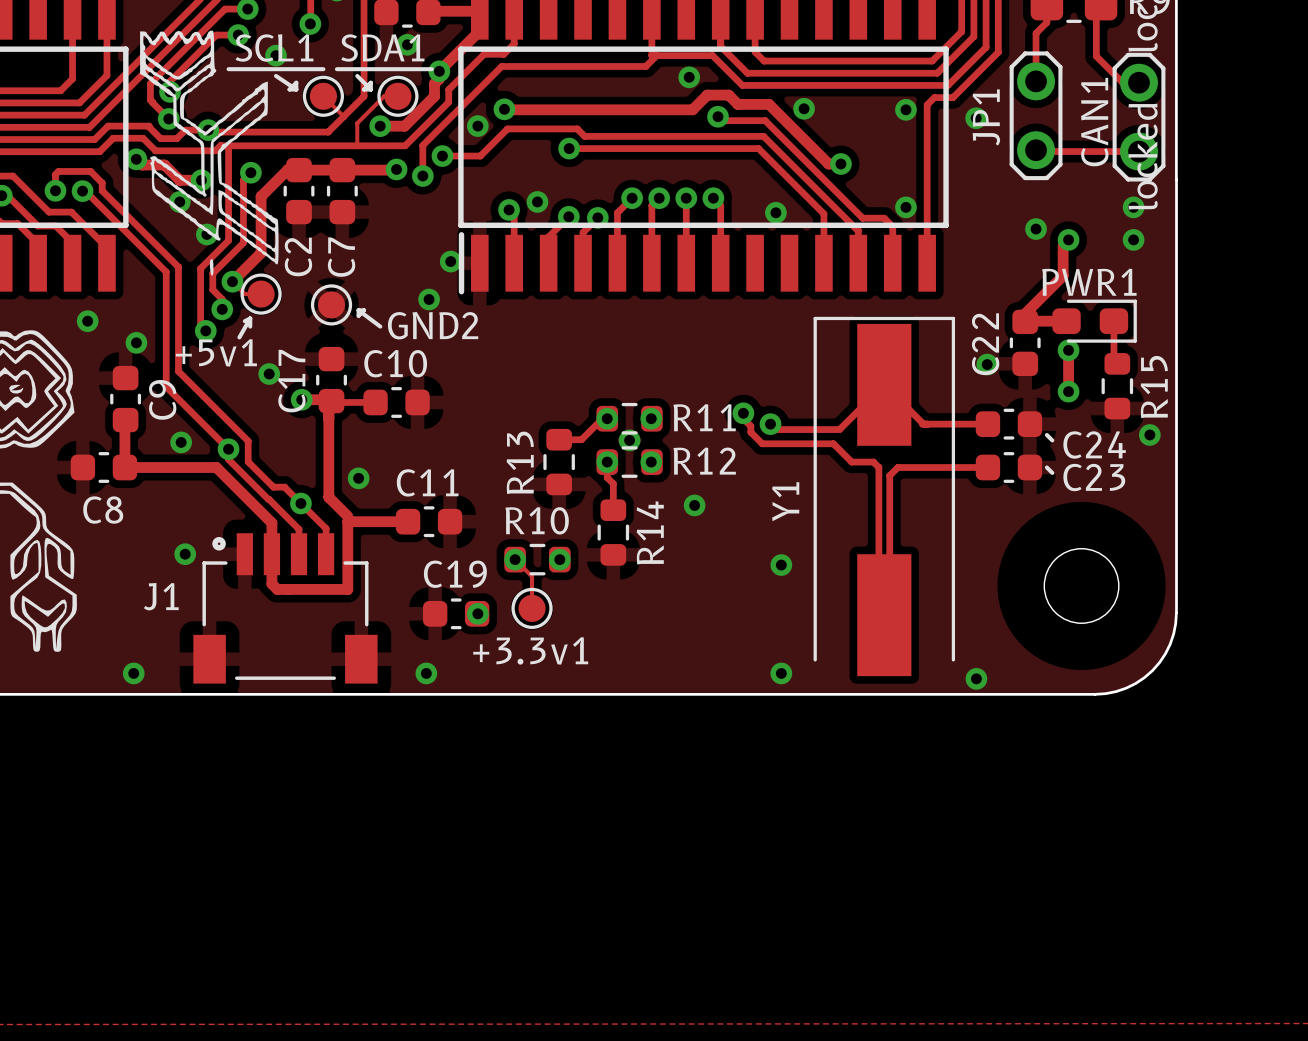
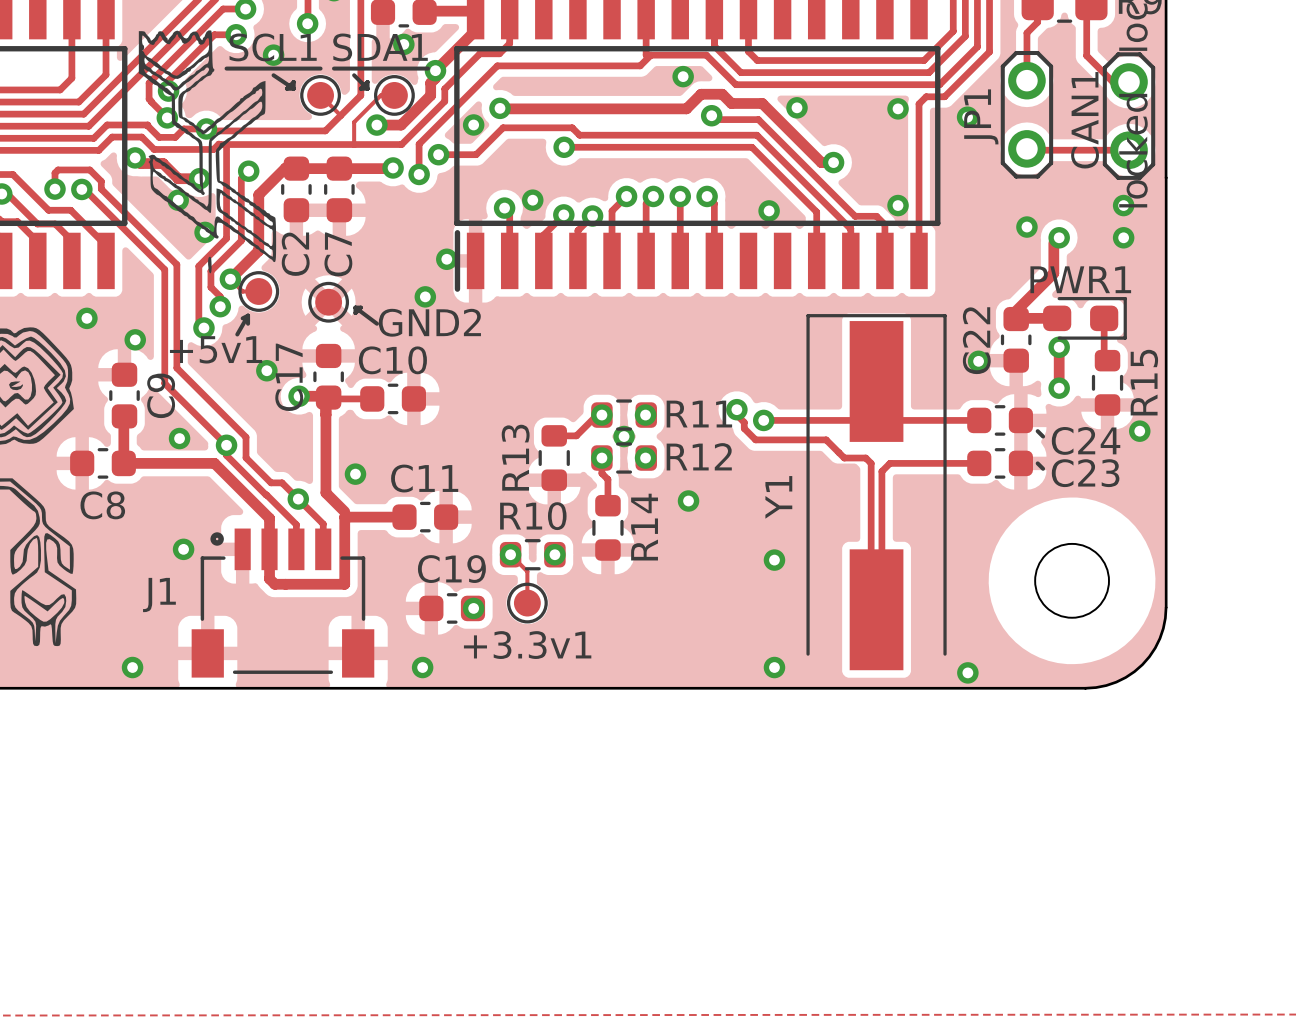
track: (770, 424) (775, 429) (839, 429) (884, 384) (923, 424) -> (763, 420) (914, 420)

